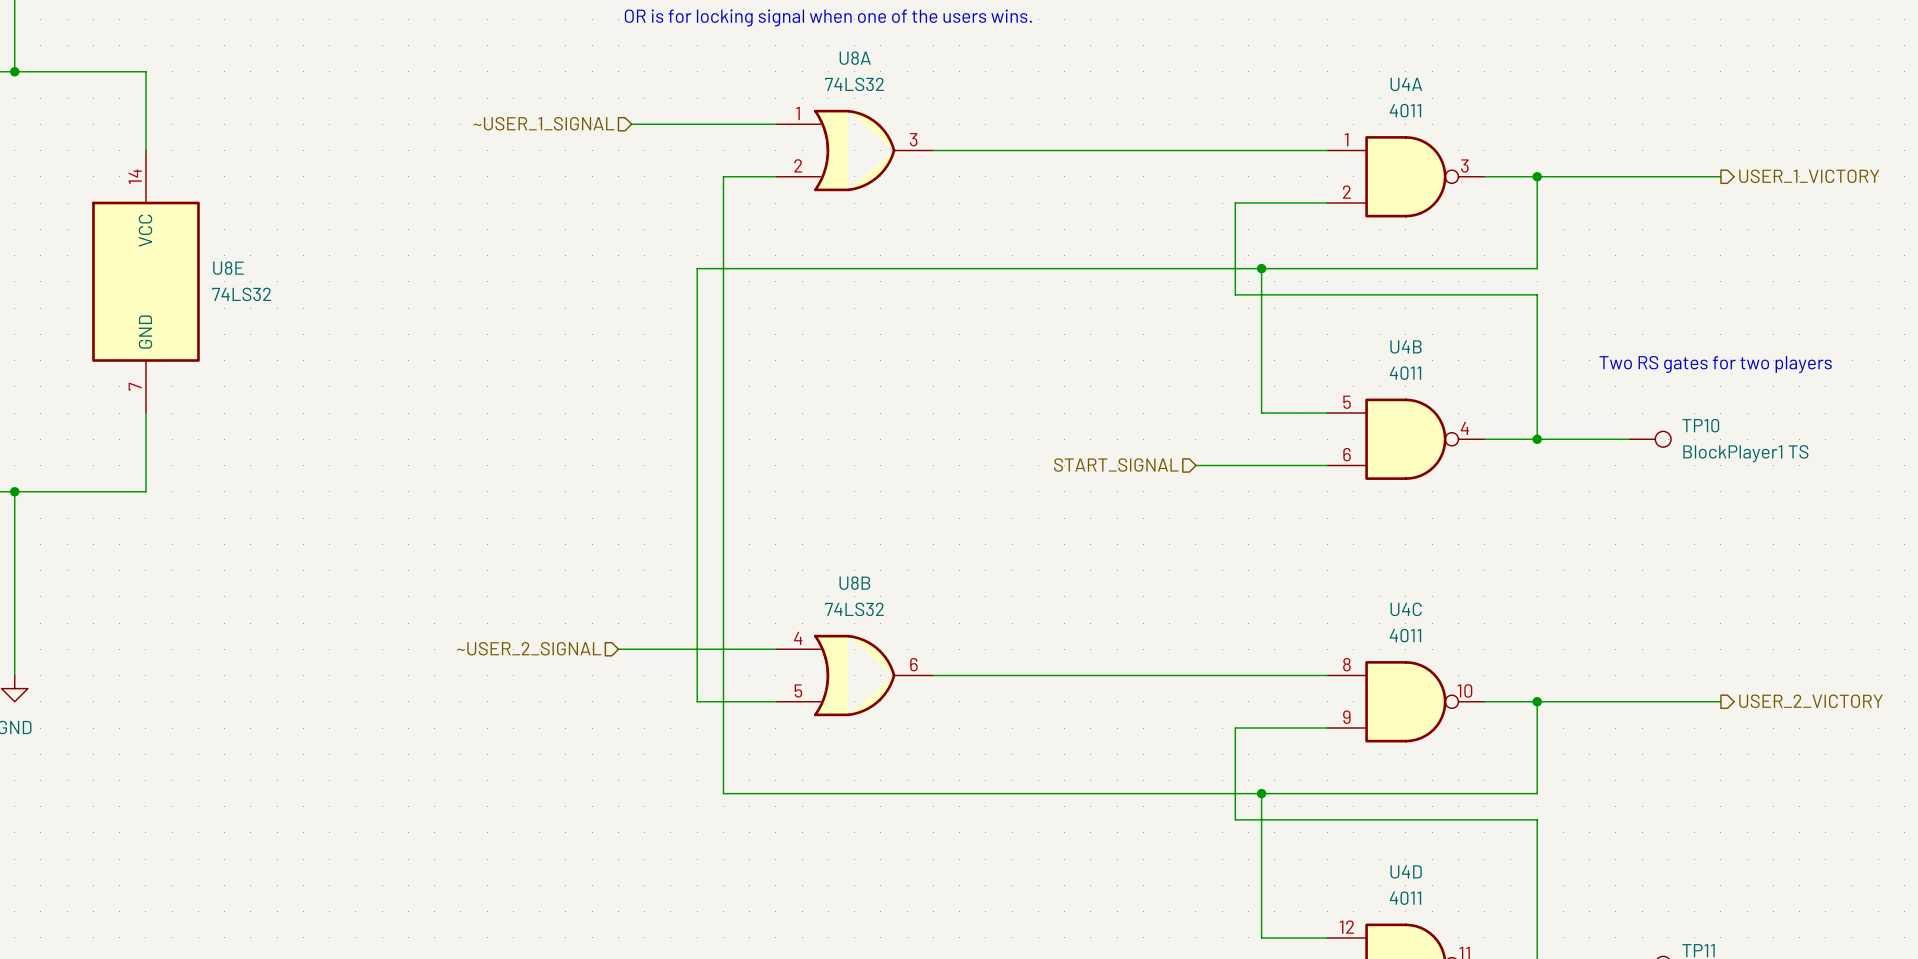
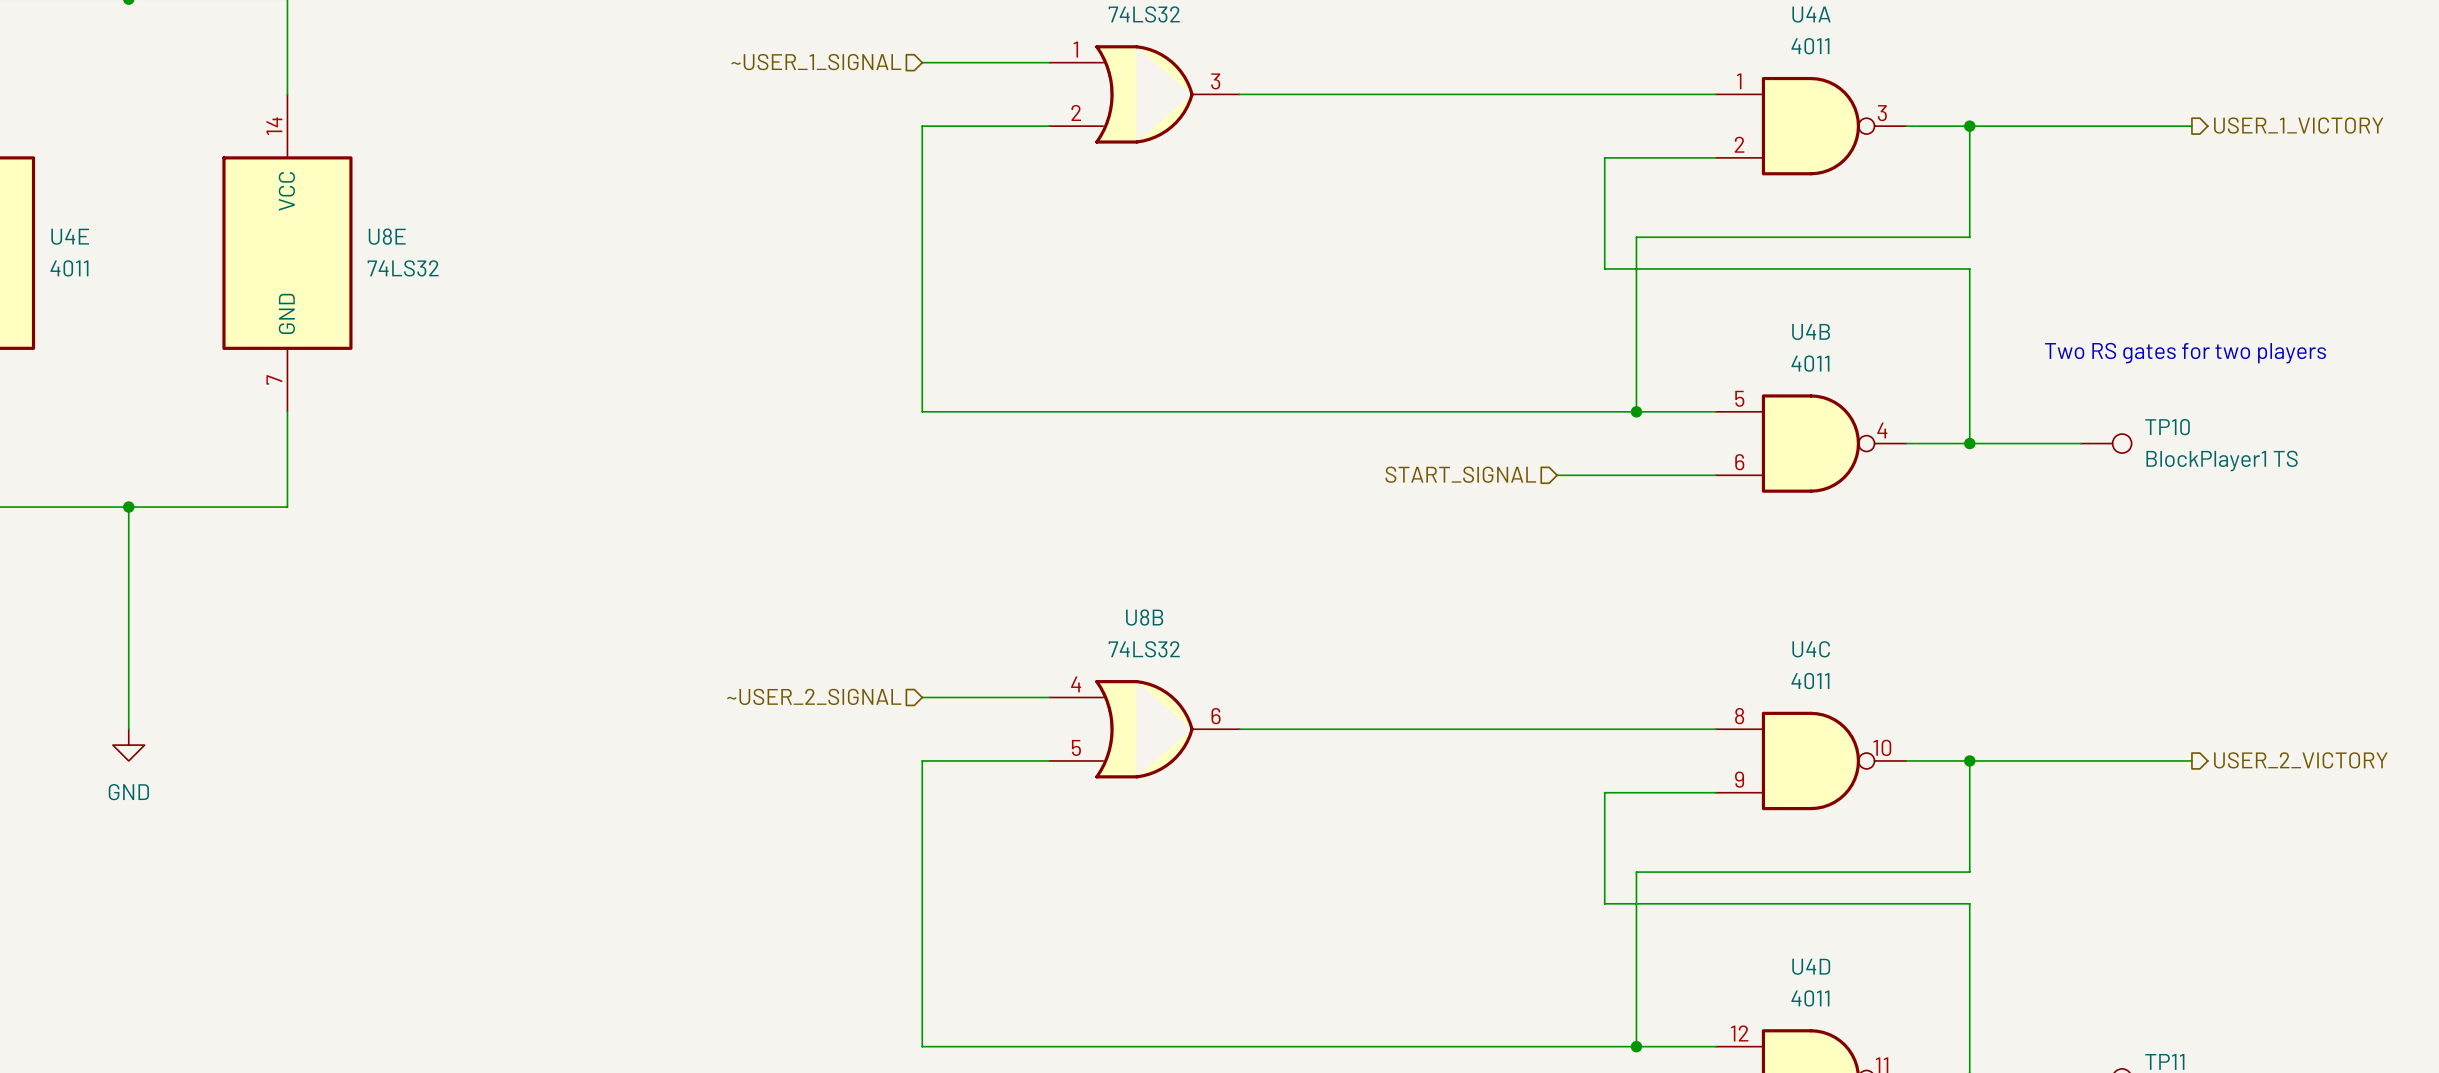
hierarchical label position: ~USER_1_SIGNAL (543, 123) -> ~USER_1_SIGNAL (816, 62)
wire: (631, 124) (670, 124) -> none
wire: (723, 176) (723, 793) (1261, 793) -> (985, 126) (922, 126) (922, 411) (1636, 411)
wire: (1261, 268) (697, 268) (697, 701) -> (1636, 1046) (922, 1046) (922, 760) (954, 760)
junction: (1261, 268) -> none
junction: none -> (1636, 411)
hierarchical label position: ~USER_2_SIGNAL (529, 648) -> ~USER_2_SIGNAL (814, 696)
wire: (618, 649) (670, 649) -> none
junction: (1261, 793) -> none
junction: none -> (1636, 1046)

